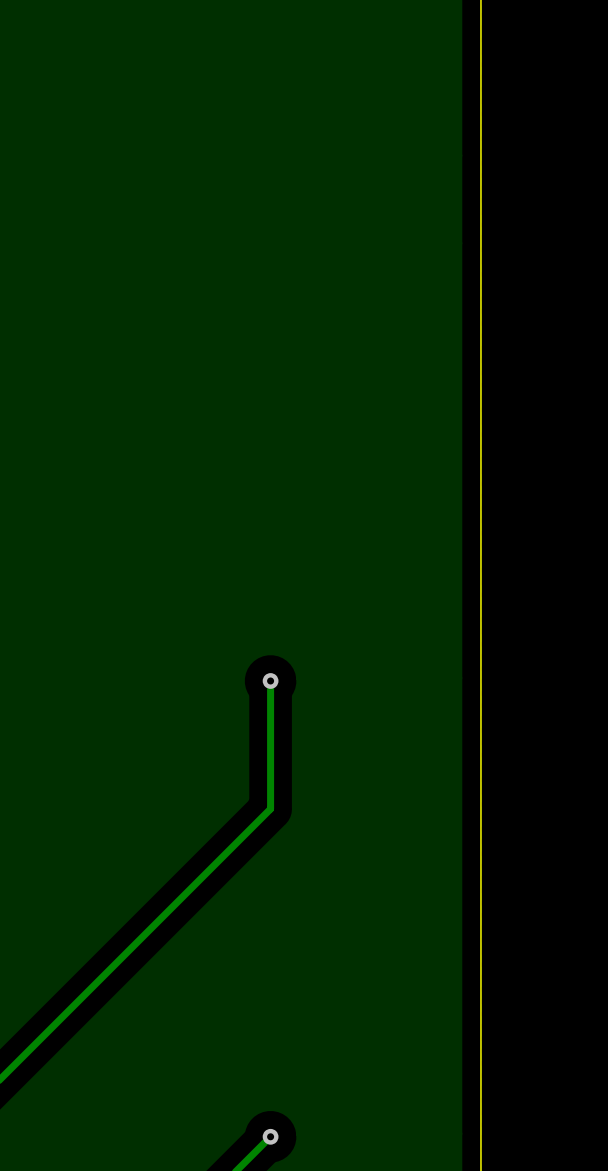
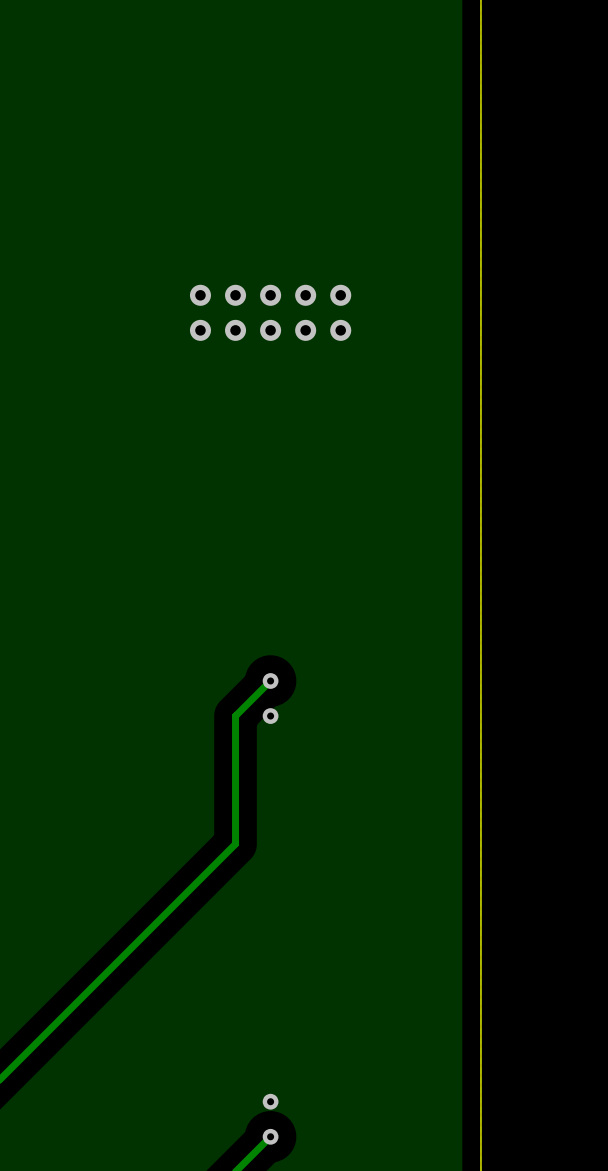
via: none -> (200, 295)
via: none -> (235, 295)
via: none -> (270, 295)
via: none -> (305, 295)
via: none -> (340, 295)
via: none -> (200, 330)
via: none -> (235, 330)
via: none -> (270, 330)
via: none -> (305, 330)
via: none -> (340, 330)
track: (270, 680) (270, 808) (235, 844) -> (270, 680) (235, 716) (235, 844)
via: none -> (270, 716)
via: none -> (270, 1101)

